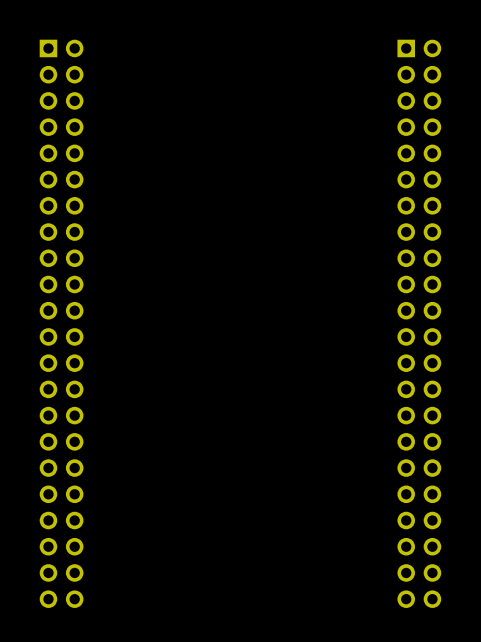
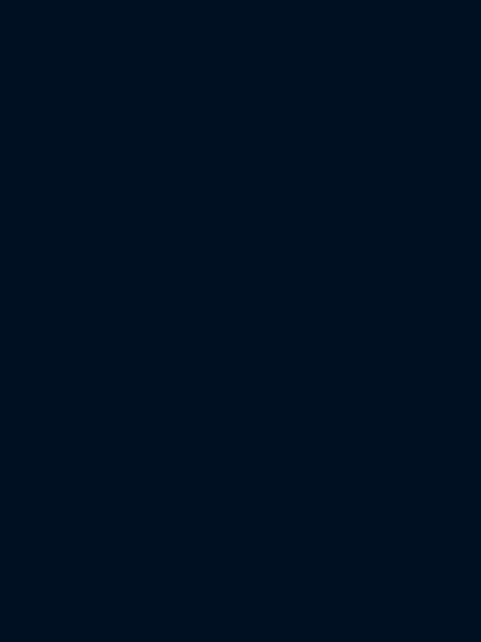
part: (61, 323) -> none
part: (419, 323) -> none

